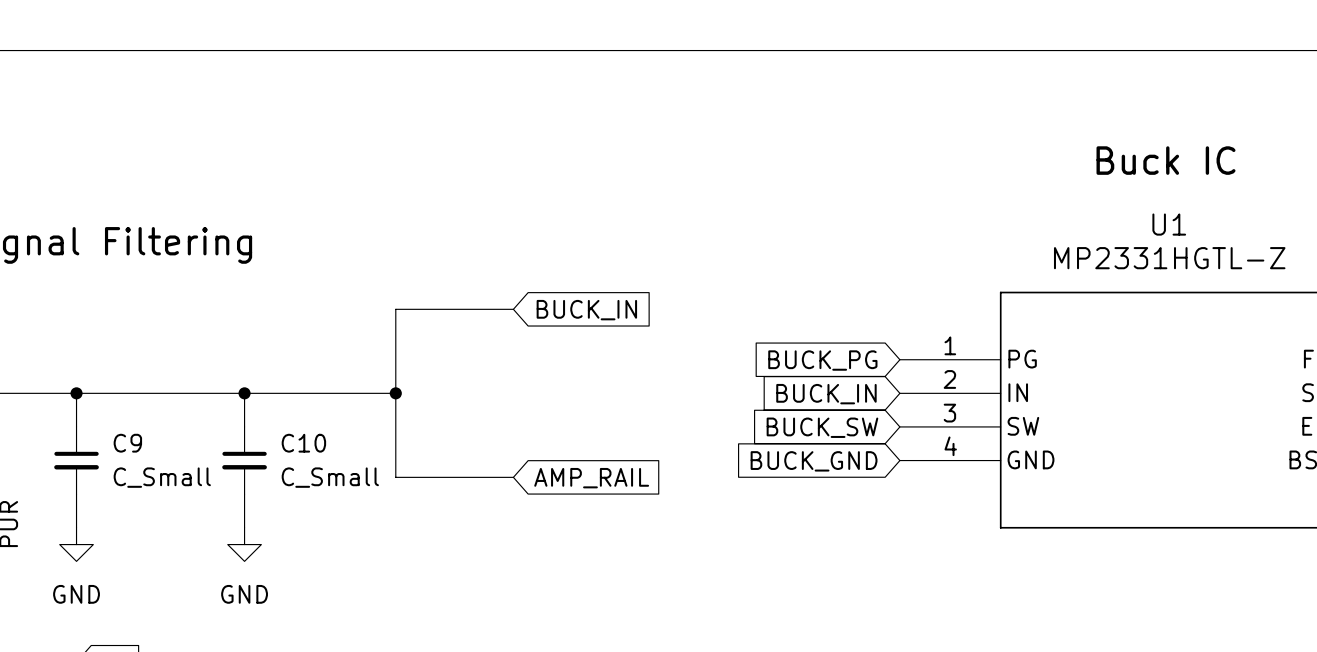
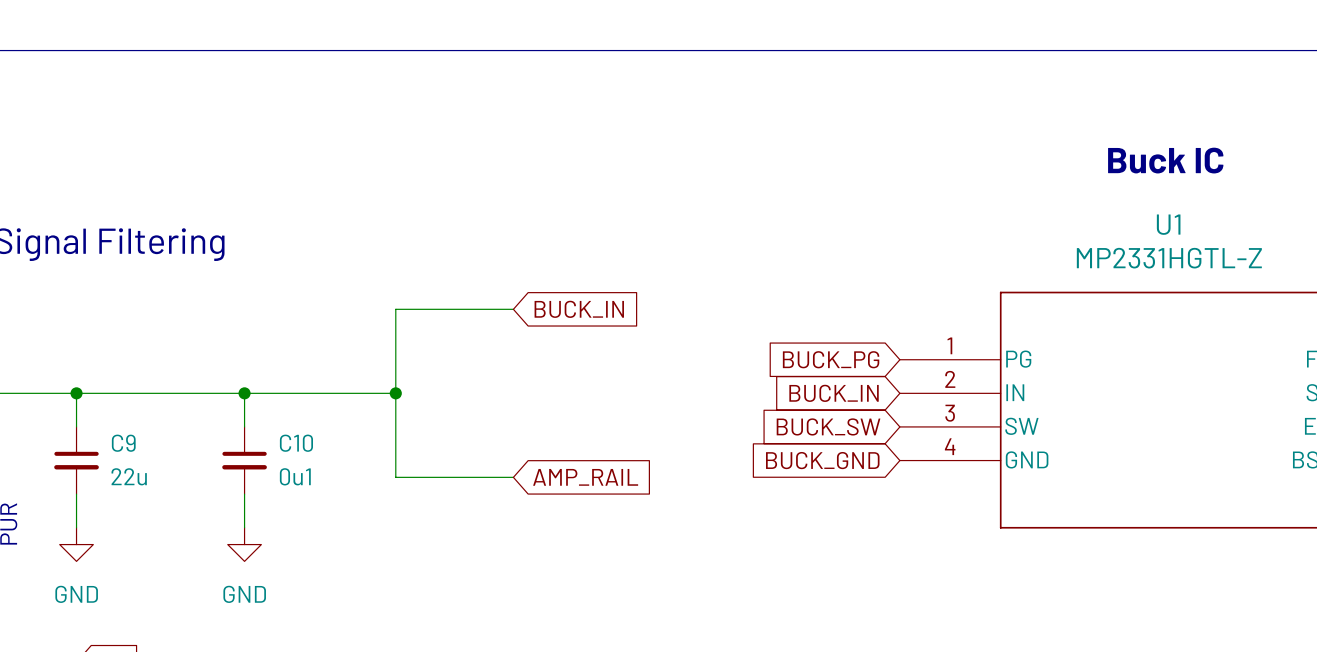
C9 value: C_Small (162, 477) -> 22u (129, 476)
C10 value: C_Small (330, 477) -> 0u1 (295, 476)

